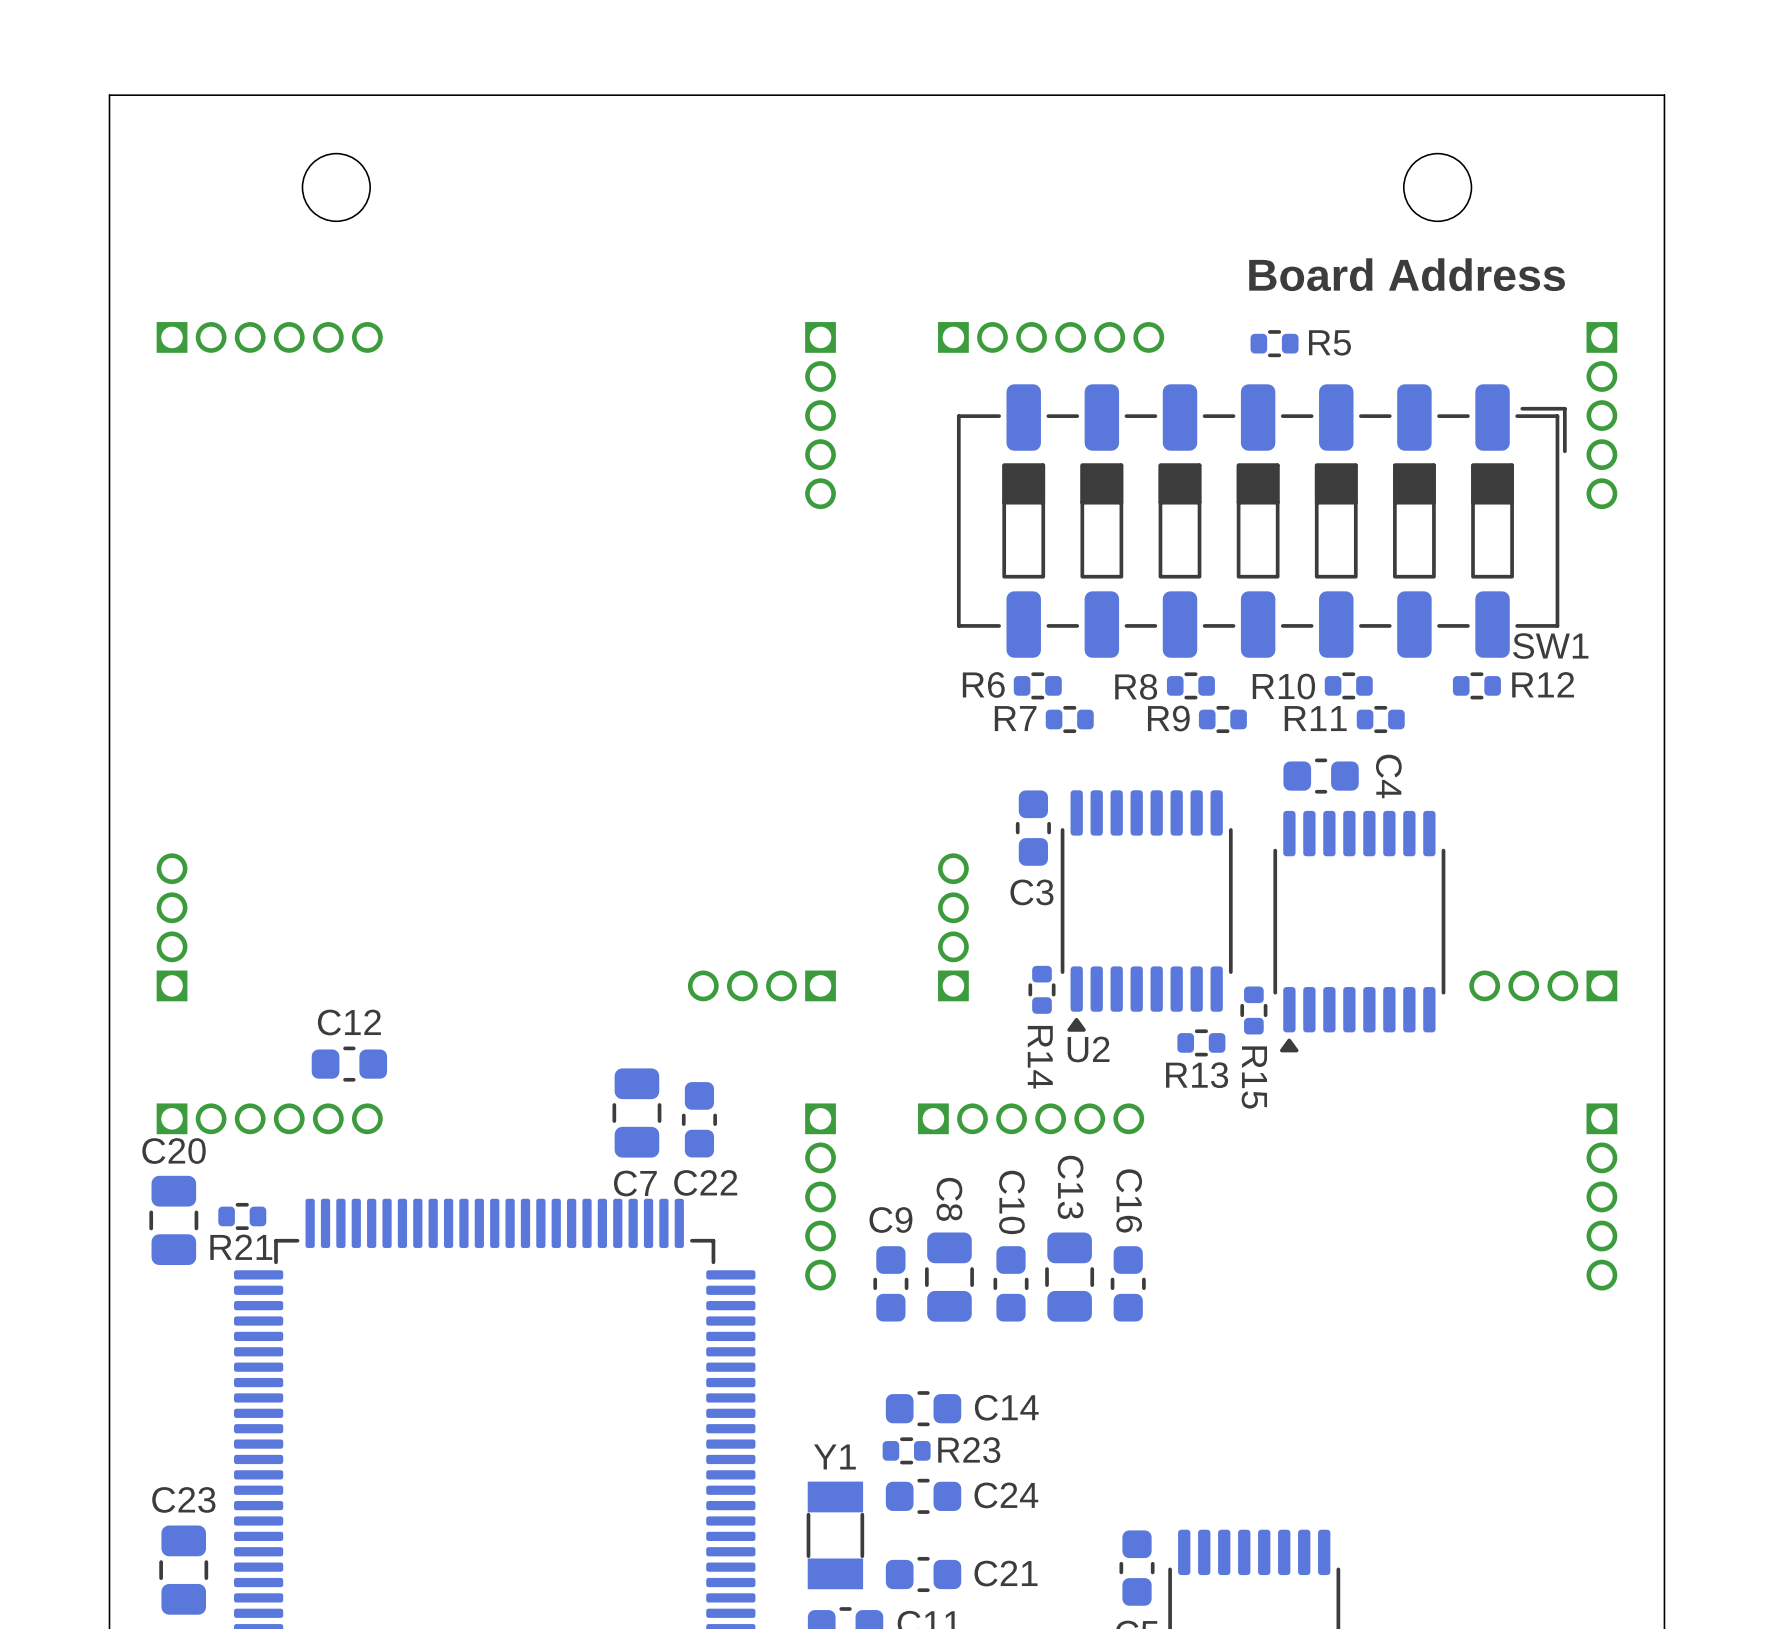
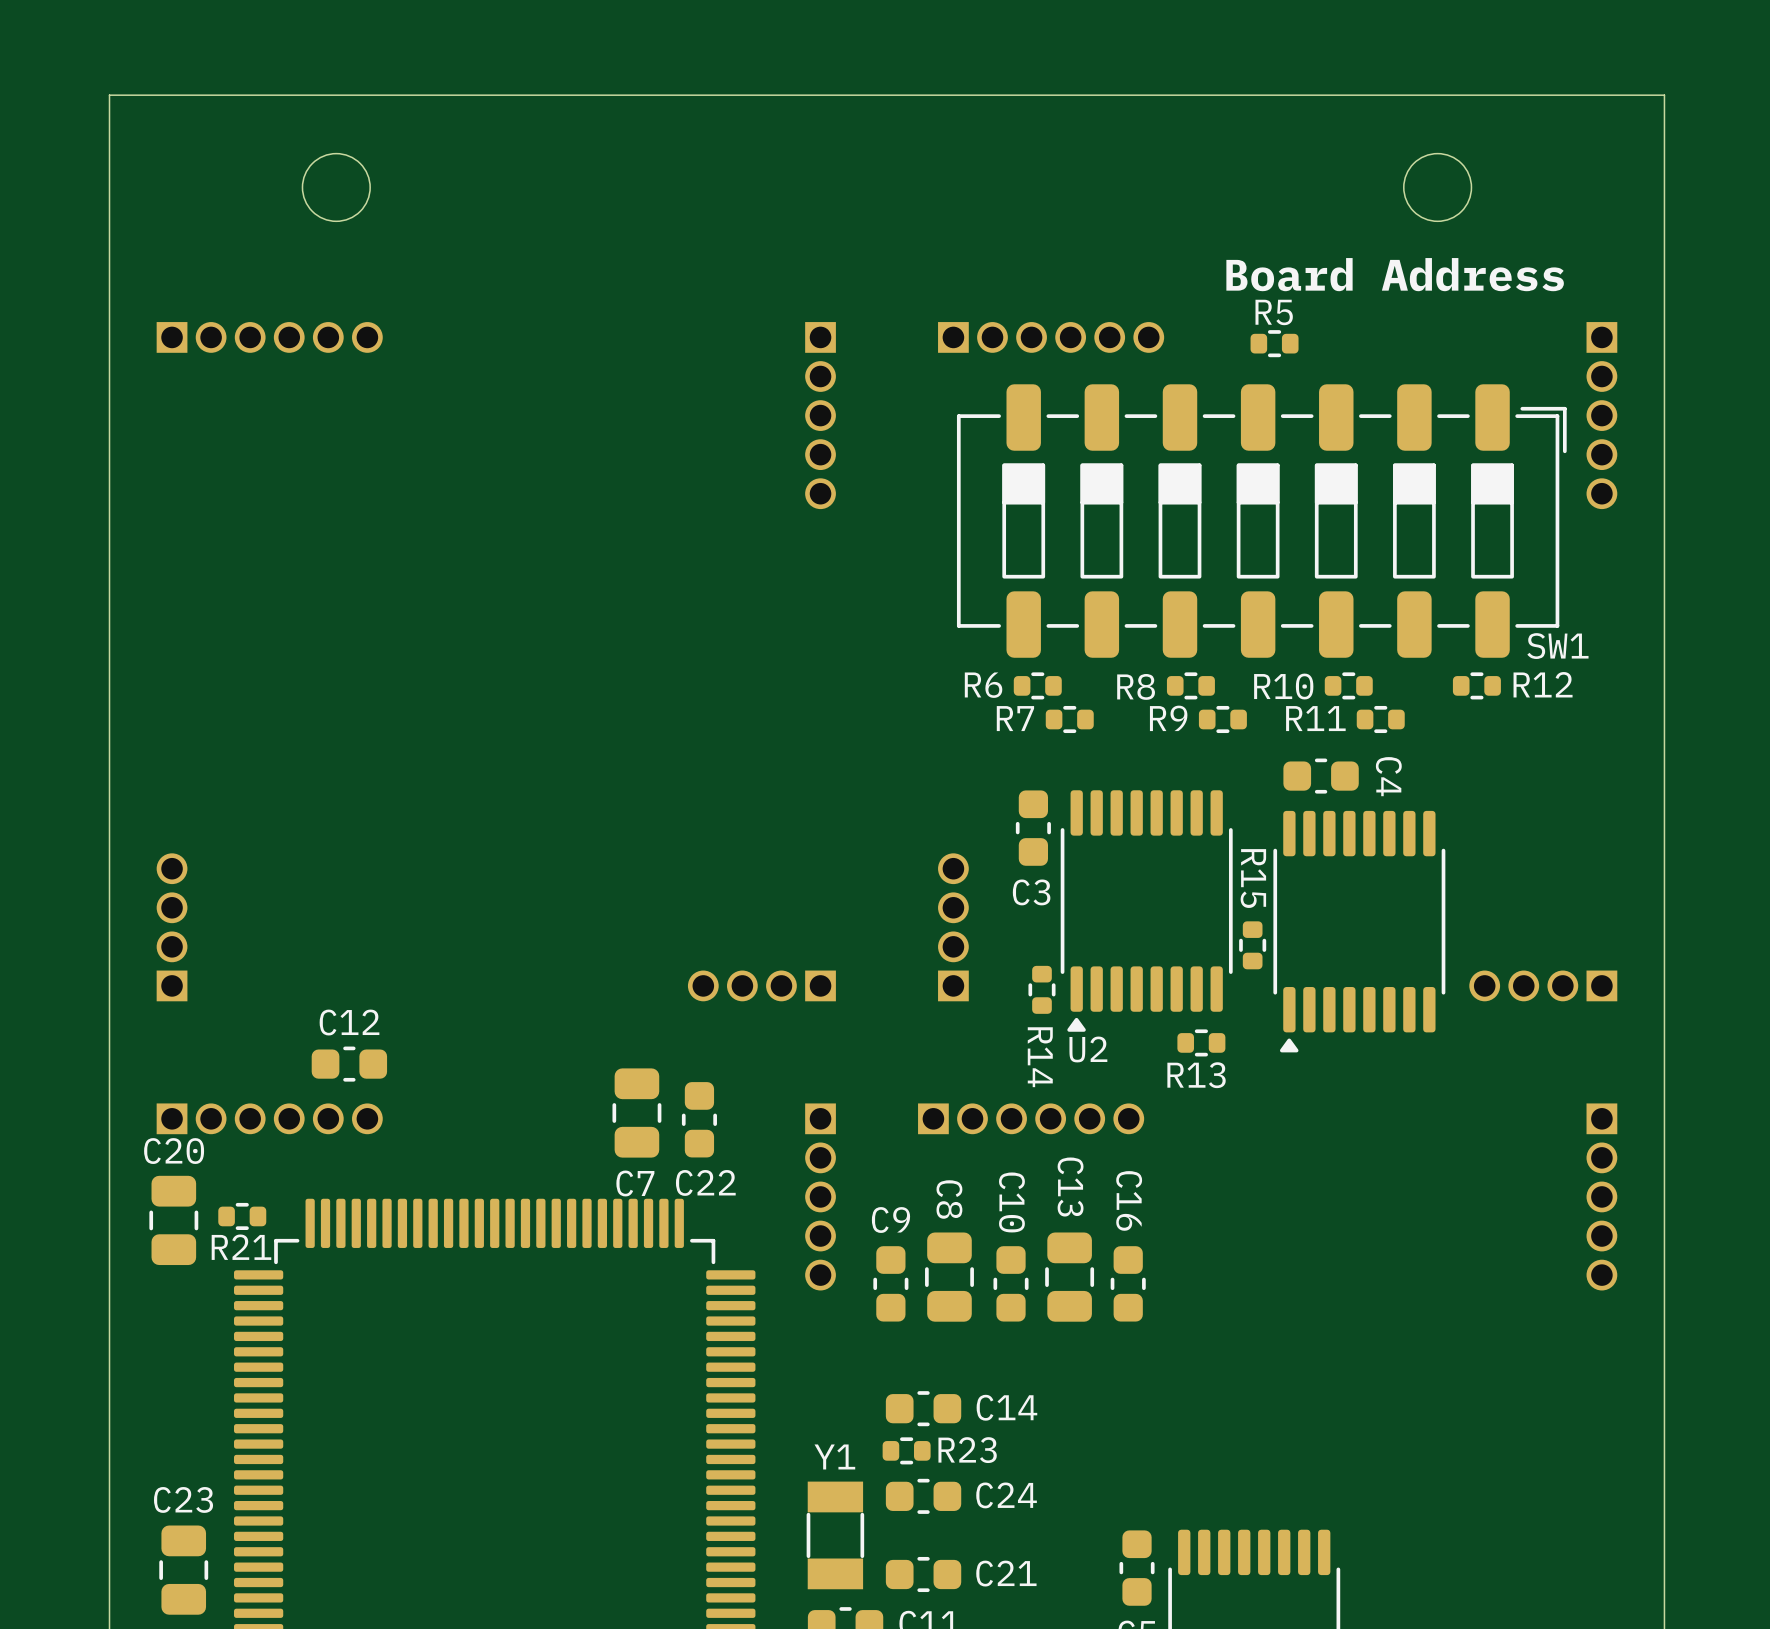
R5 name position: R5 (1329, 342) -> R5 (1274, 312)
R15 position: (1253, 1010) -> (1252, 945)
R15 name position: R15 (1254, 1077) -> R15 (1253, 878)

